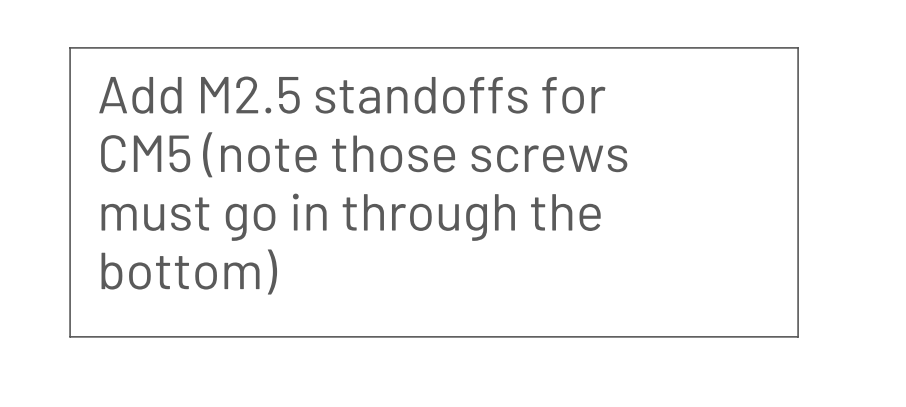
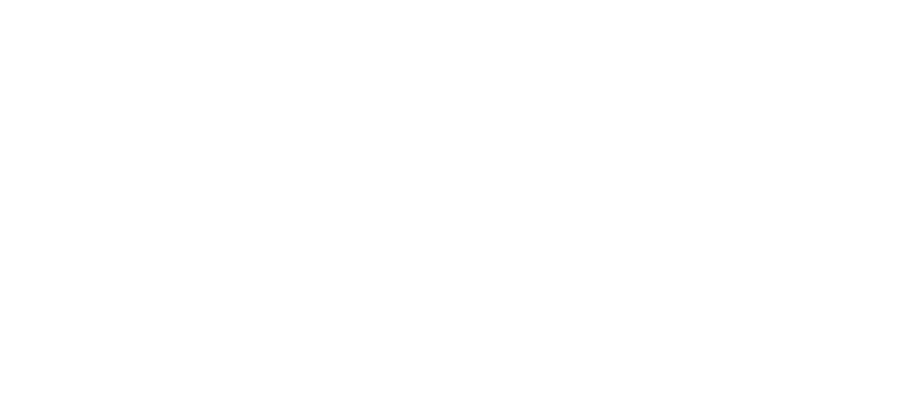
line: (70, 47) (798, 47) (798, 336) (70, 336) (70, 47) -> none
text: Add M2.5 standoffs for (352, 95) -> none
text: CM5 (note those screws (364, 154) -> none
text: must go in through the (351, 217) -> none
text: bottom) (189, 272) -> none

